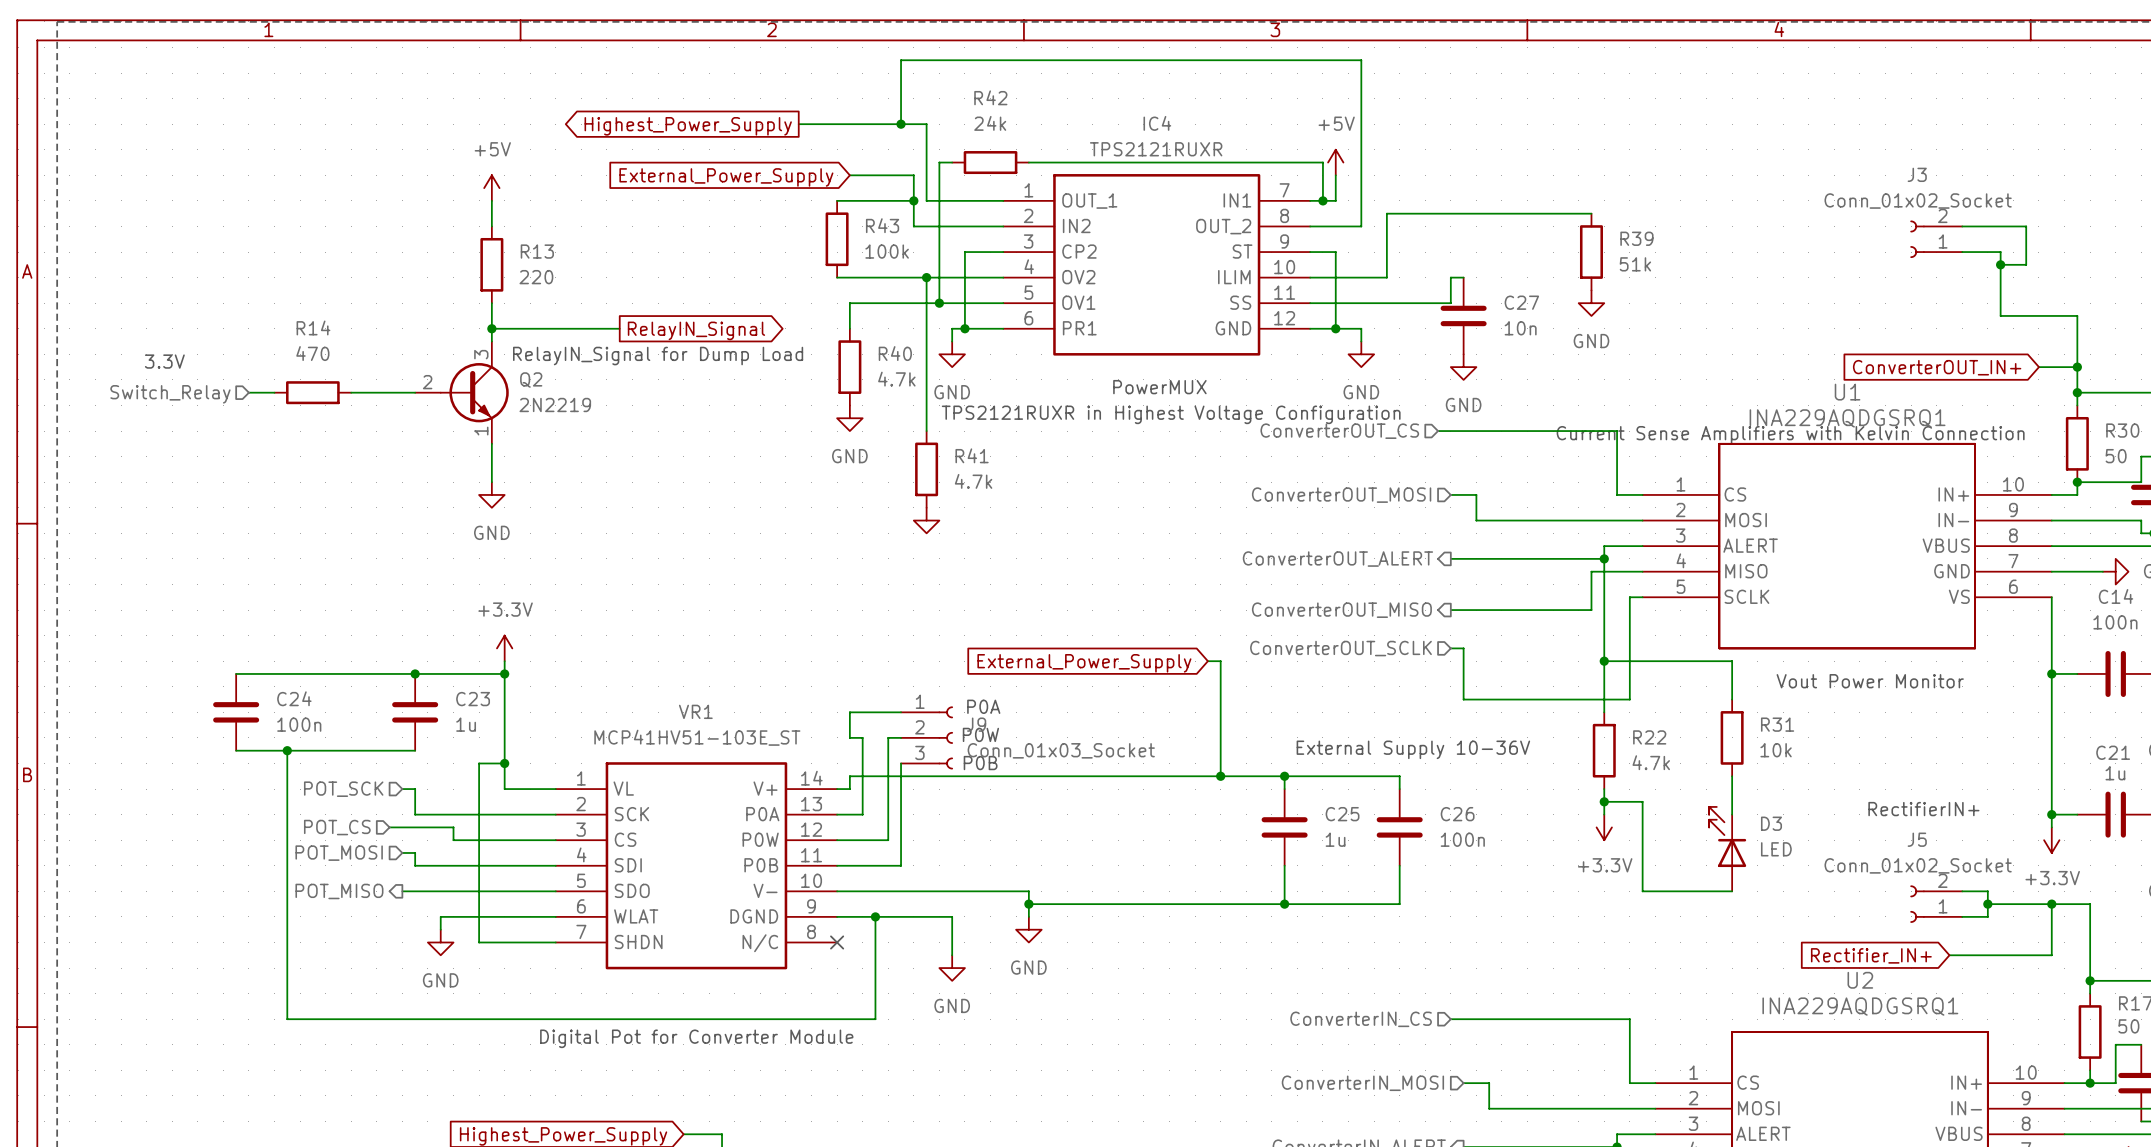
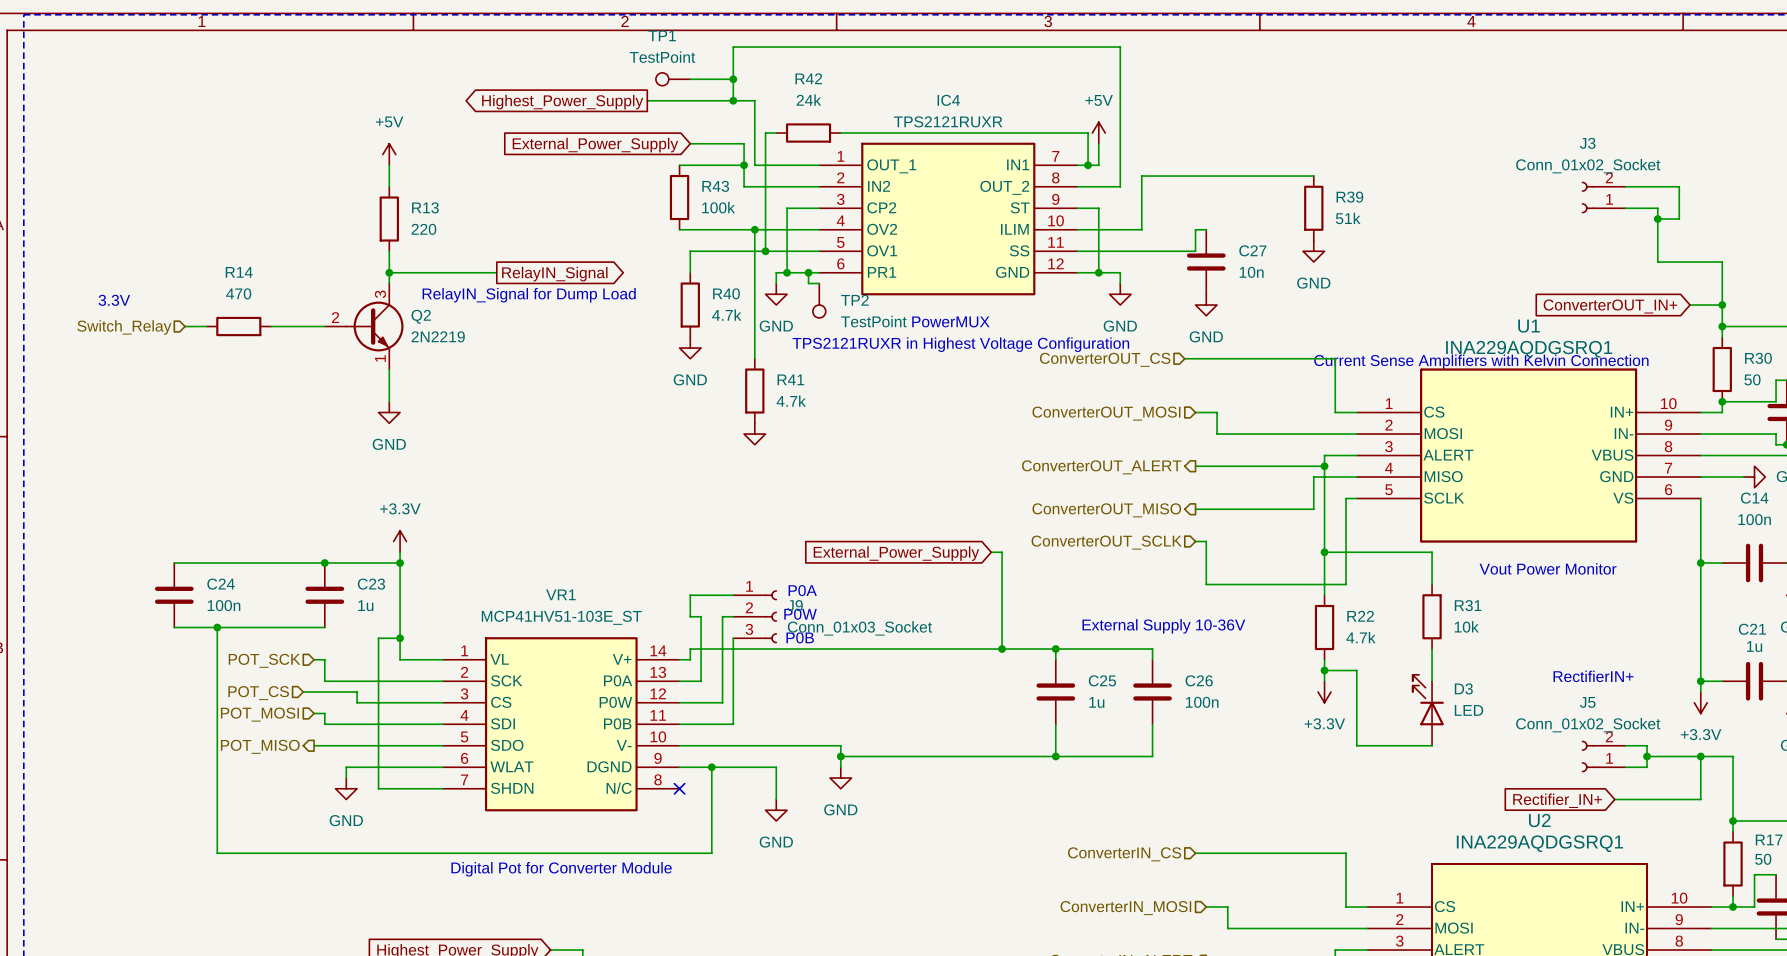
TP1: none -> TestPoint (673, 79)
wire: none -> (690, 79) (733, 79)
junction: none -> (733, 79)
wire: none -> (808, 272) (808, 283) (819, 283)
junction: none -> (808, 272)
TP2: none -> TestPoint (819, 300)

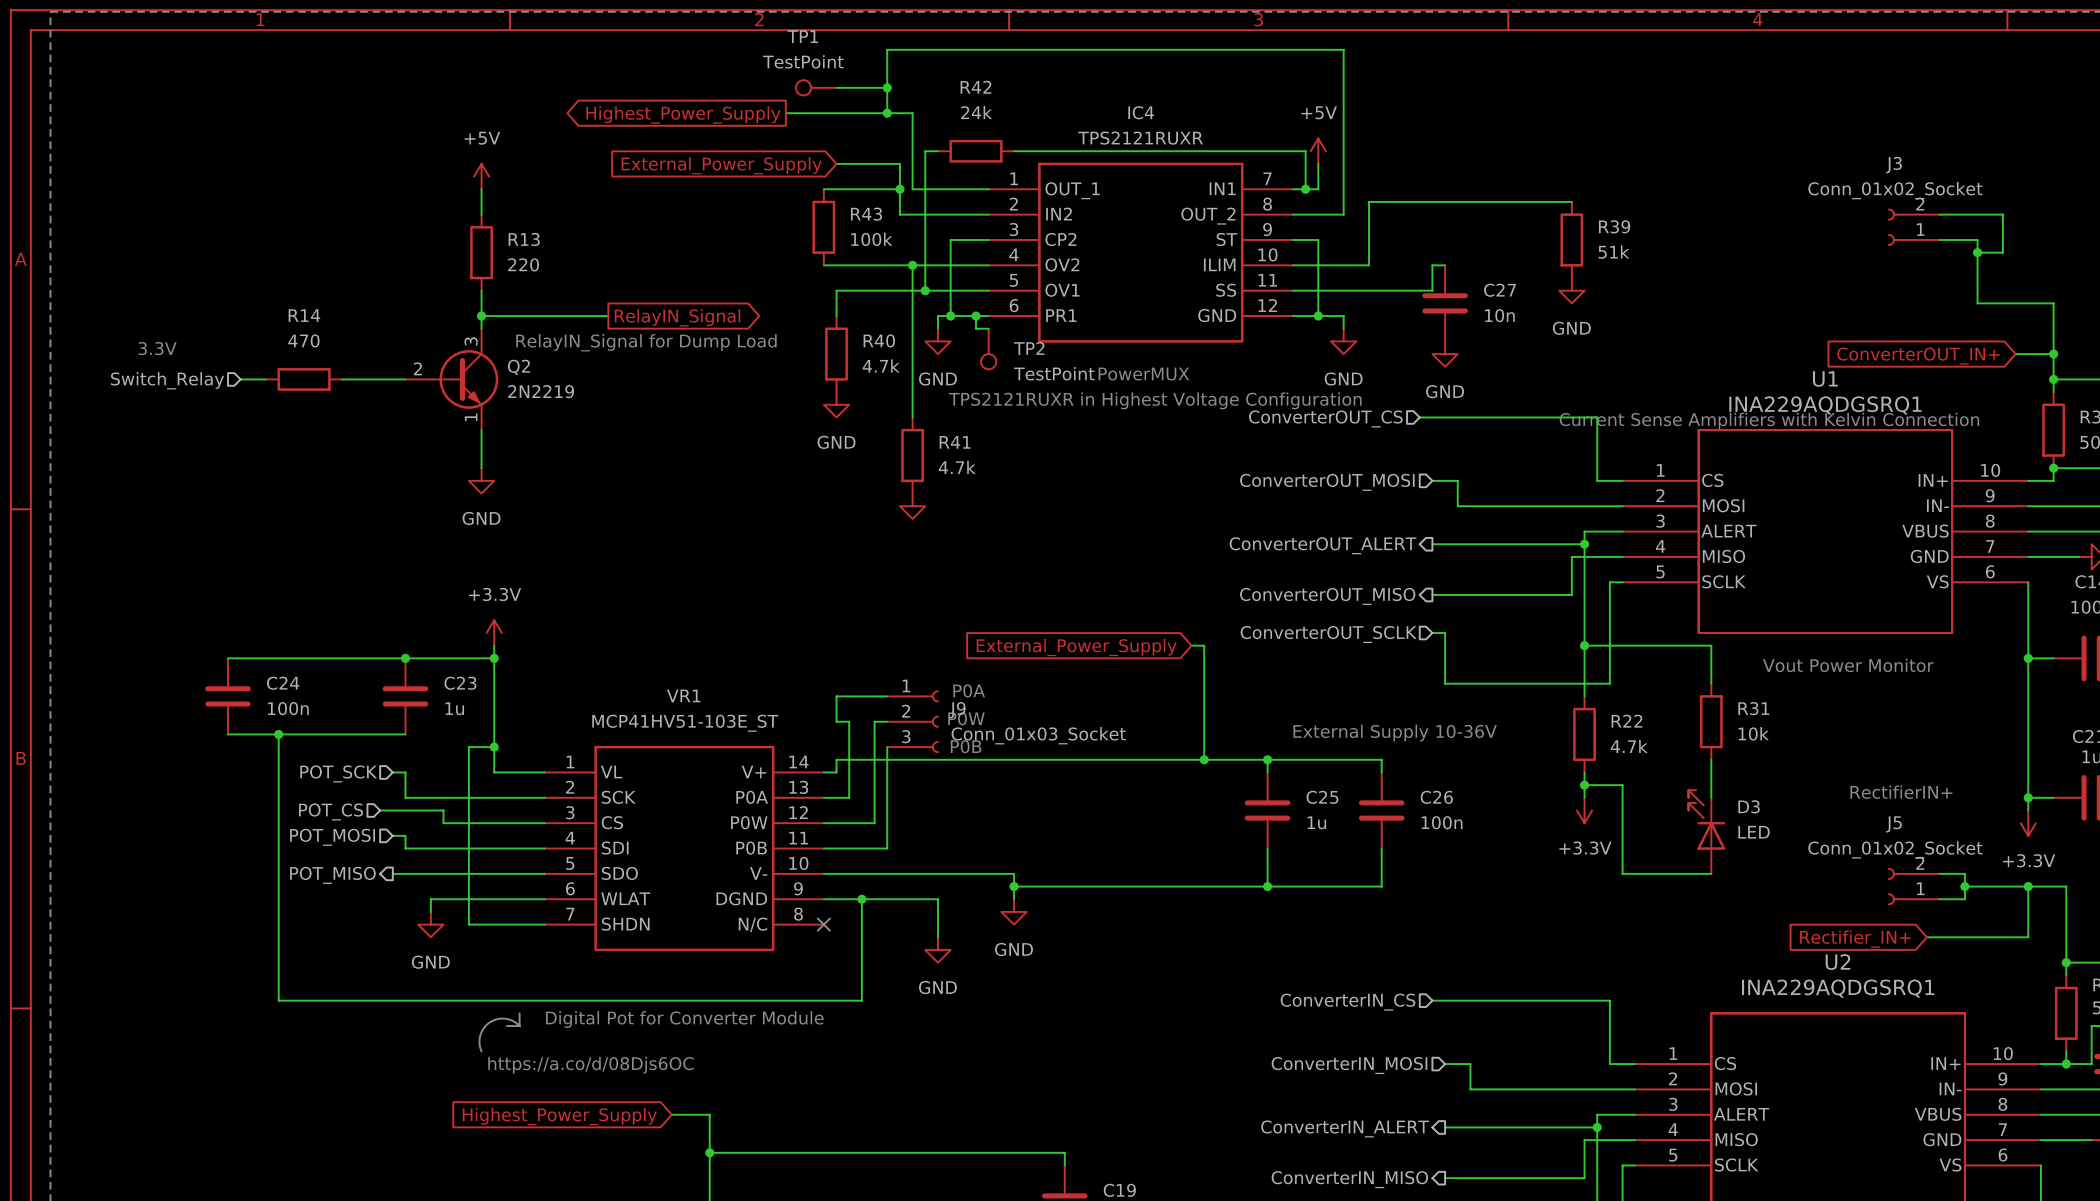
line: none -> (519, 1013) (519, 1026)
line: none -> (506, 1026) (519, 1026)
line: none -> (519, 1026) (512, 1020) (503, 1018) (489, 1022) (483, 1028) (479, 1036) (481, 1051)
text: none -> https://a.co/d/08Djs6OC (590, 1065)

